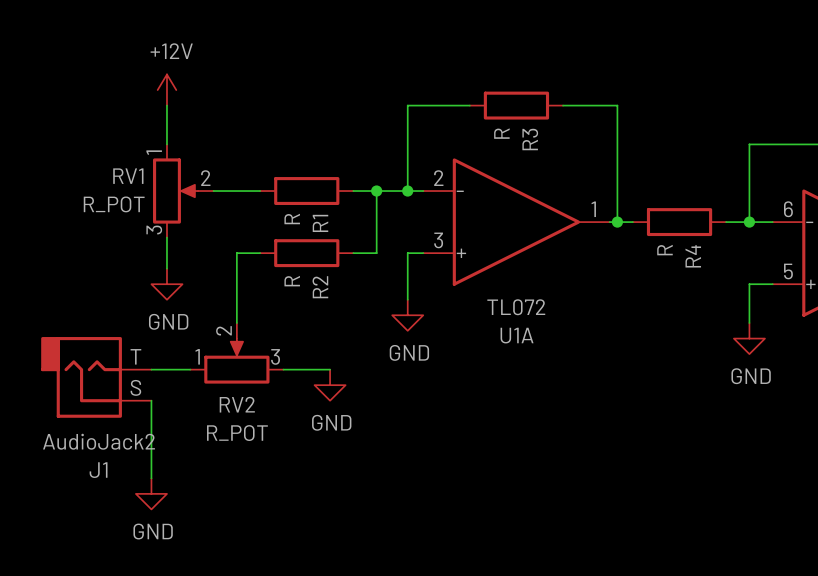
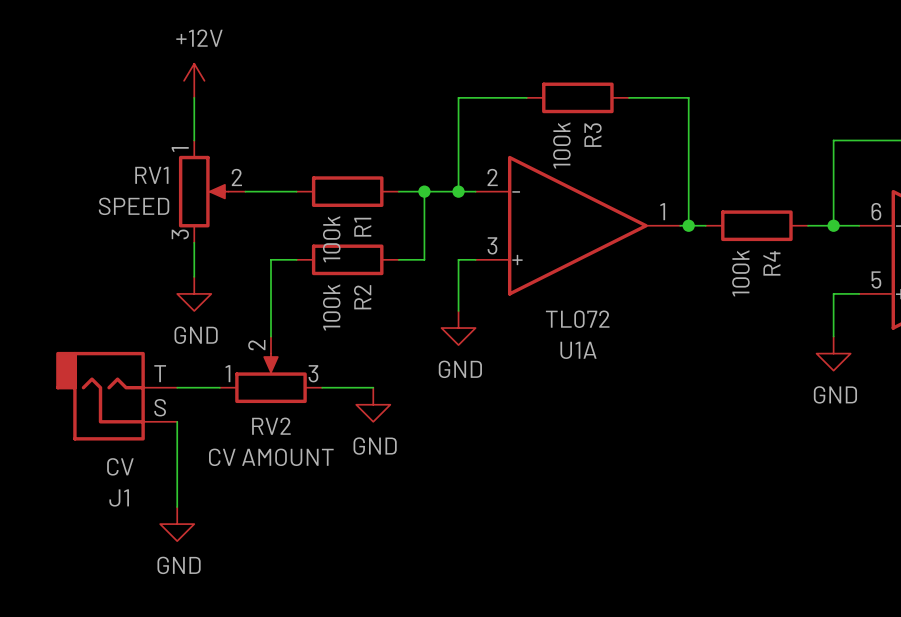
R3 value: R (501, 133) -> 100k (561, 145)
RV1 value: R_POT (114, 204) -> SPEED (134, 206)
R1 value: R (292, 219) -> 100k (331, 239)
R4 value: R (664, 250) -> 100k (740, 273)
R2 value: R (292, 281) -> 100k (331, 307)
RV2 value: R_POT (237, 433) -> CV AMOUNT (271, 457)
J1 value: AudioJack2 (98, 441) -> CV (120, 466)

